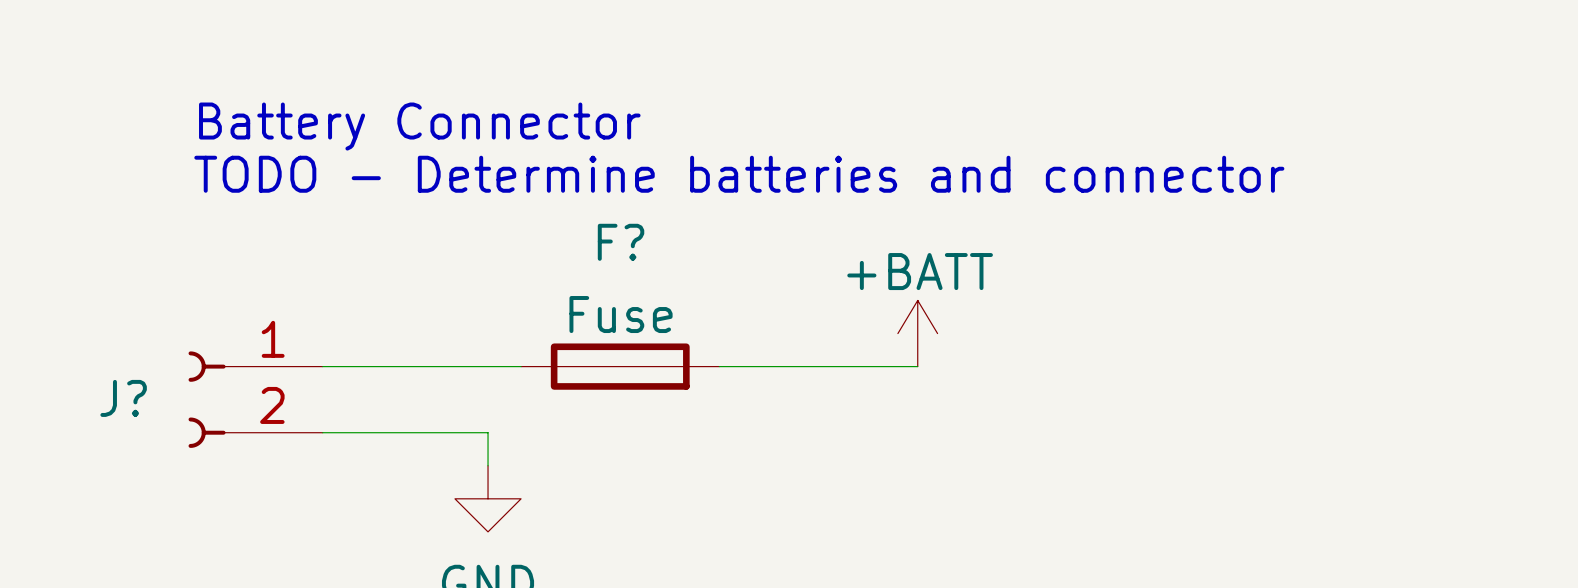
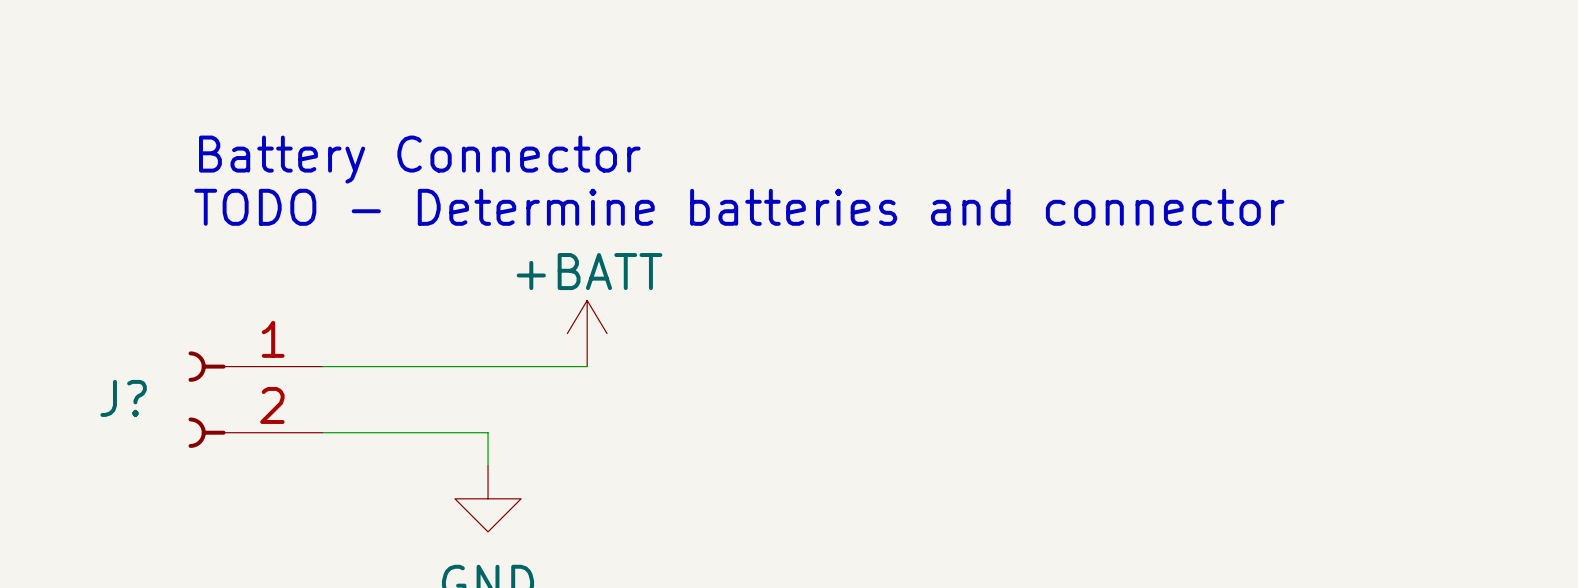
text position: Battery Connector (419, 126) -> Battery Connector (419, 159)
text position: TODO - Determine batteries and connector (739, 174) -> TODO - Determine batteries and connector (739, 207)
power symbol position: +BATT (917, 333) -> +BATT (587, 333)
F?: Fuse (620, 366) -> none
wire: (719, 366) (917, 366) -> none

